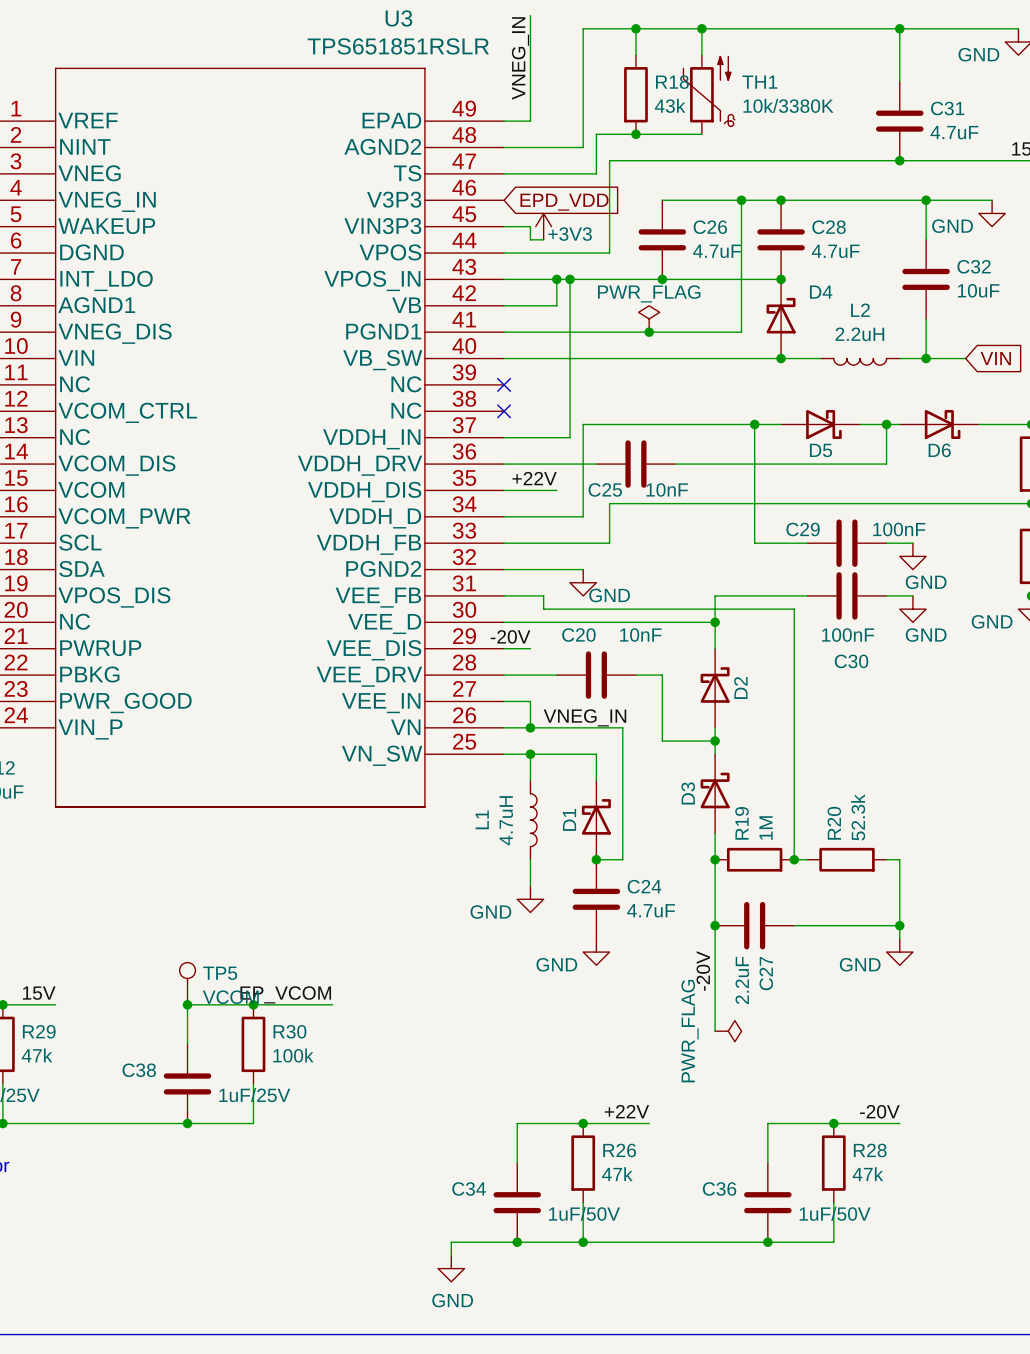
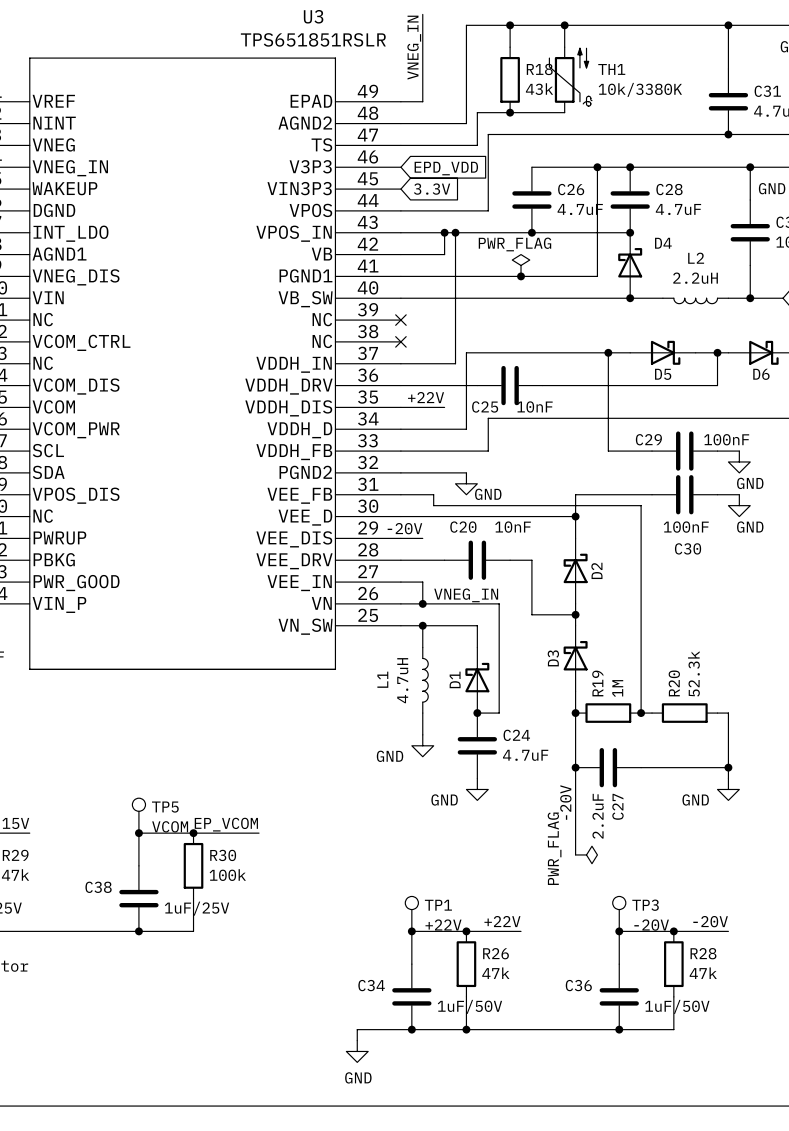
wire: (504, 226) (530, 226) (530, 239) (543, 239) -> none
global label: none -> 3.3V (432, 189)
power symbol: +3V3 (543, 226) -> none
TP1: none -> +22V (411, 913)
TP3: none -> -20V (619, 913)
junction: none -> (411, 931)
junction: none -> (619, 931)

